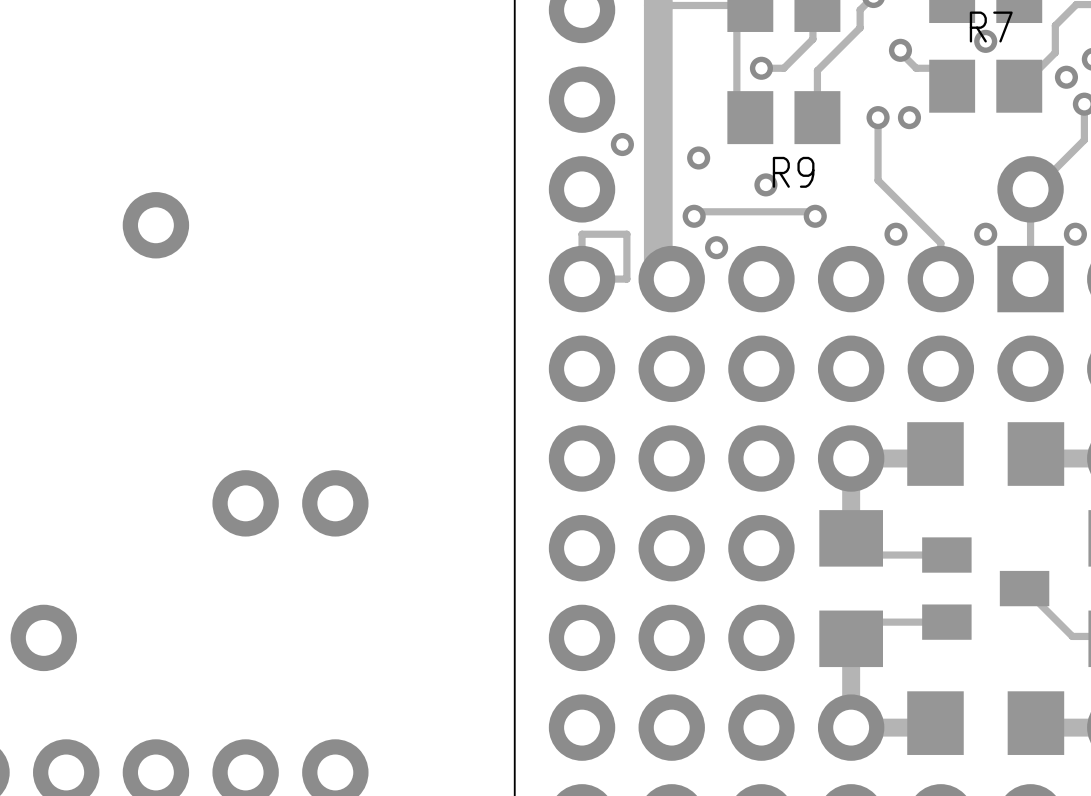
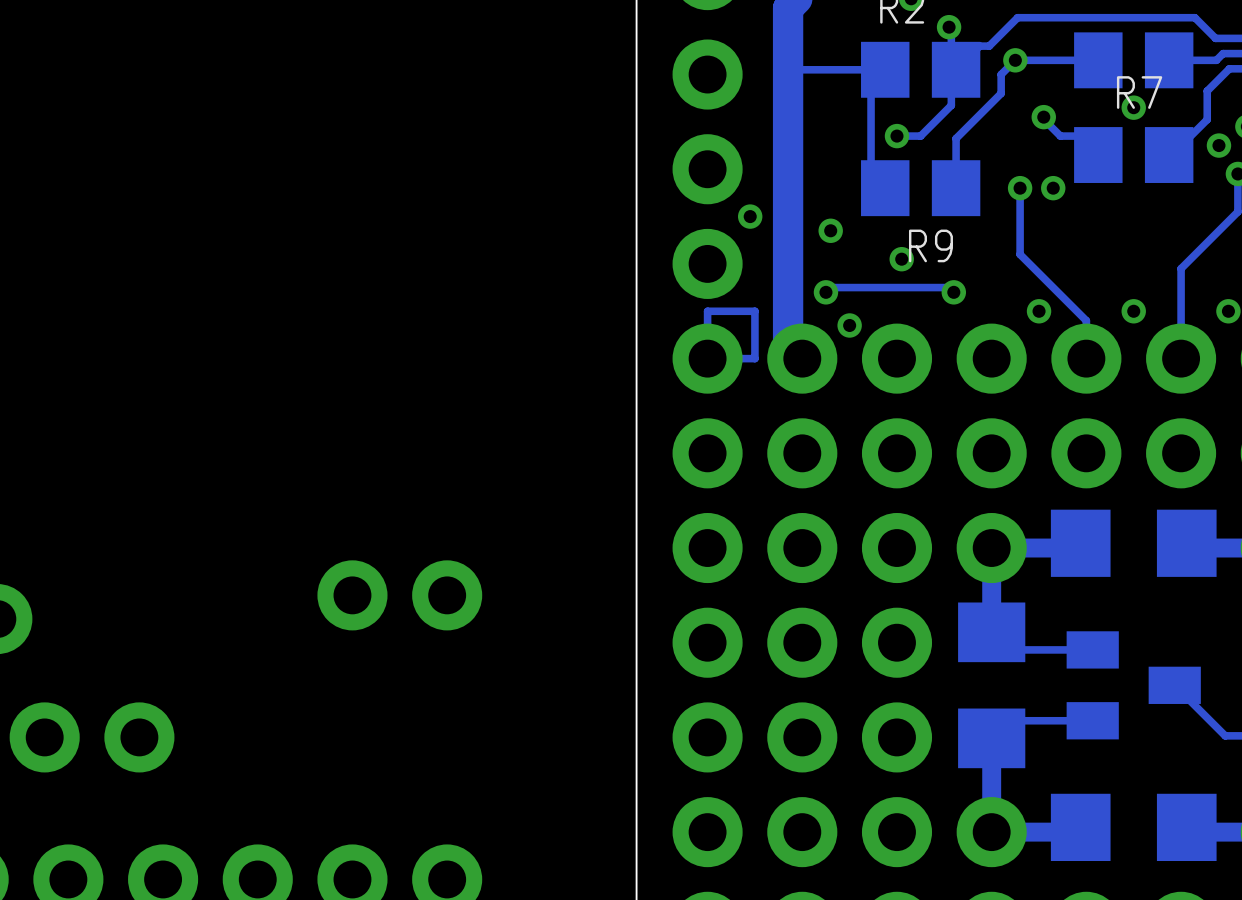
part position: (155, 225) -> (1181, 358)
part: (1030, 234) -> none

